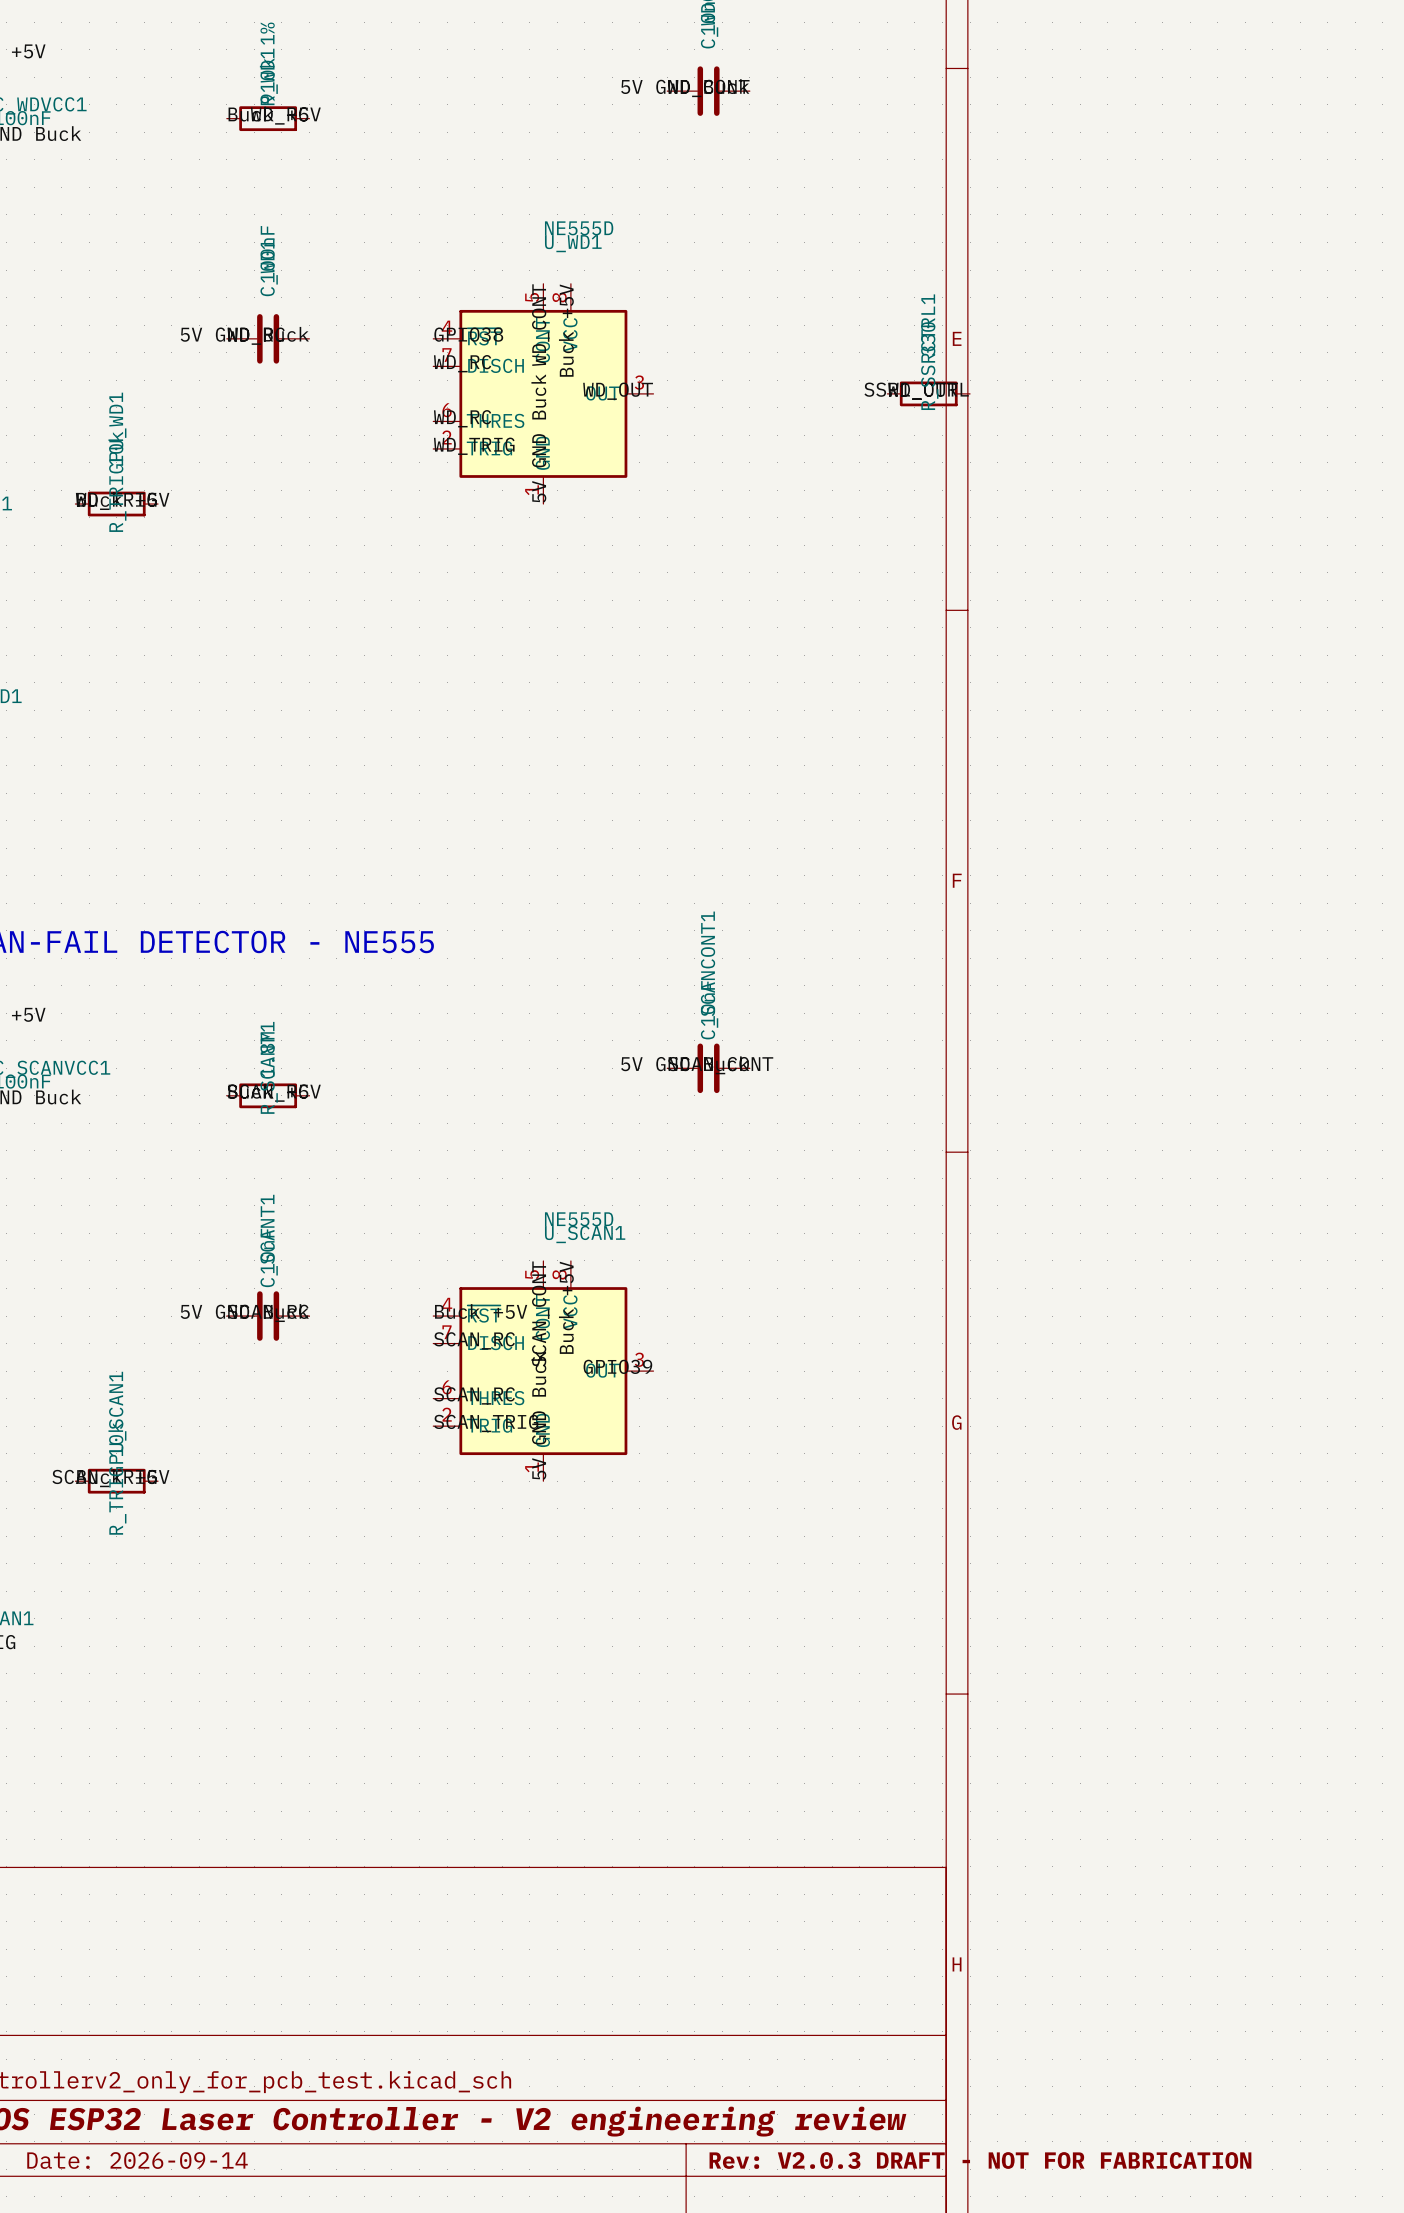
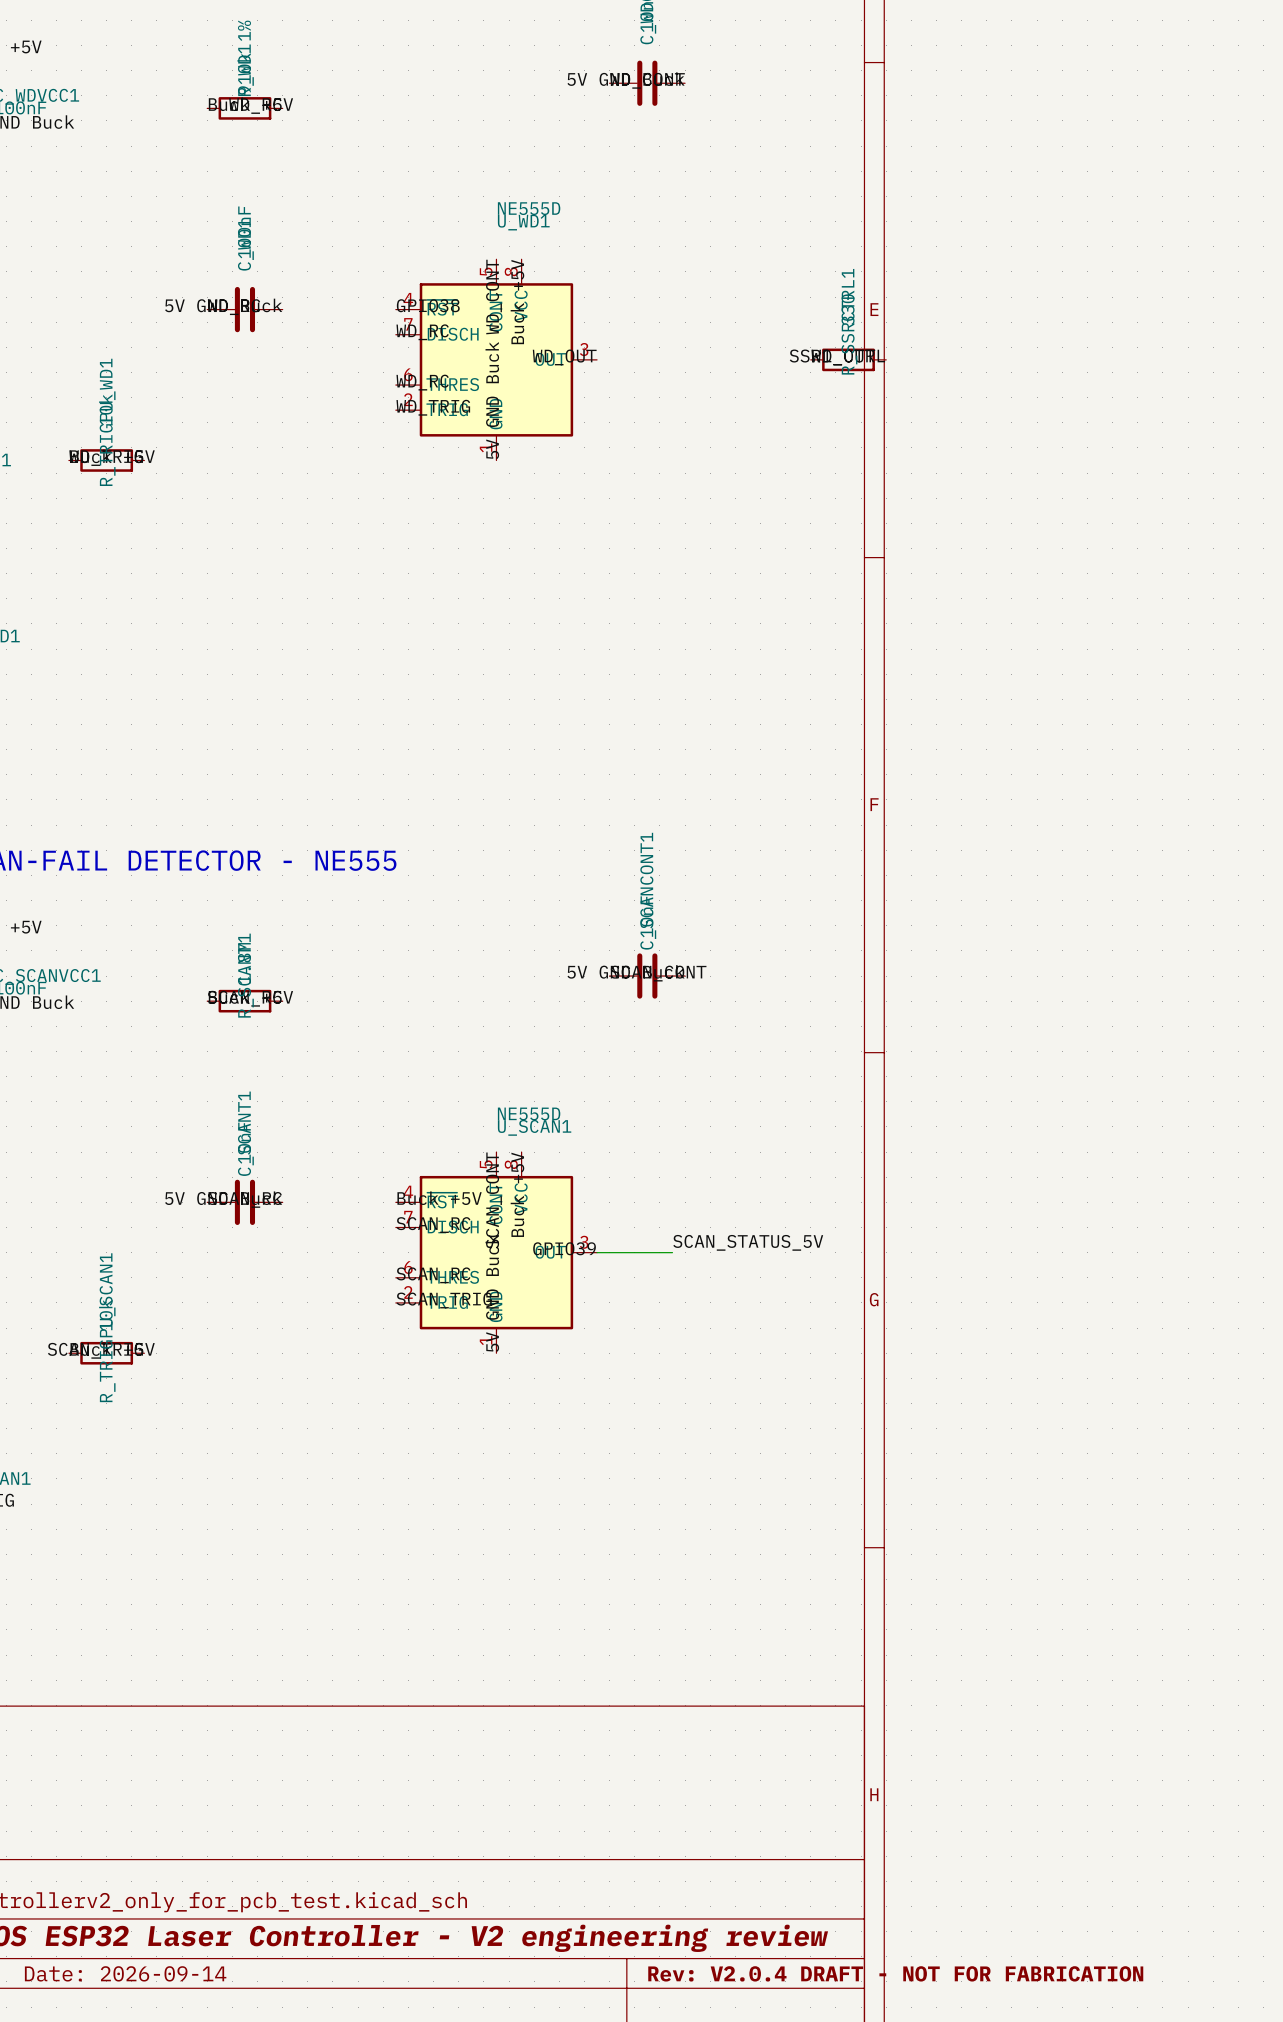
label: none -> SCAN_STATUS_5V (748, 1242)
wire: none -> (597, 1252) (672, 1252)
title block: Rev: V2.0.3 DRAFT - NOT FOR FABRICATION (980, 2160) -> Rev: V2.0.4 DRAFT - NOT FOR FABRICATION (895, 1973)

